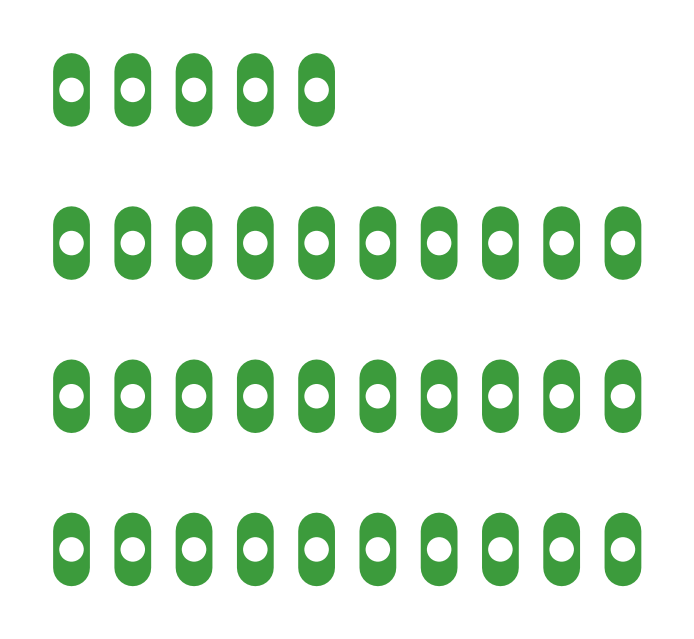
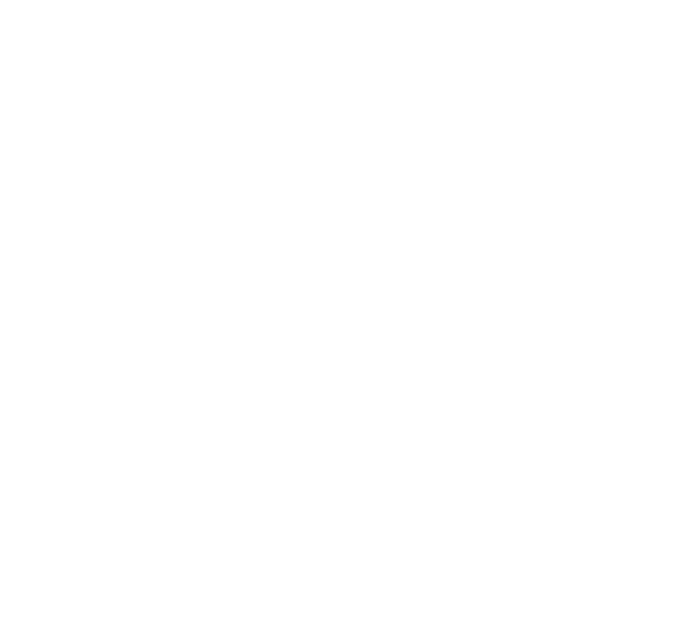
part: (194, 89) -> none
part: (347, 243) -> none
part: (347, 396) -> none
part: (347, 549) -> none

